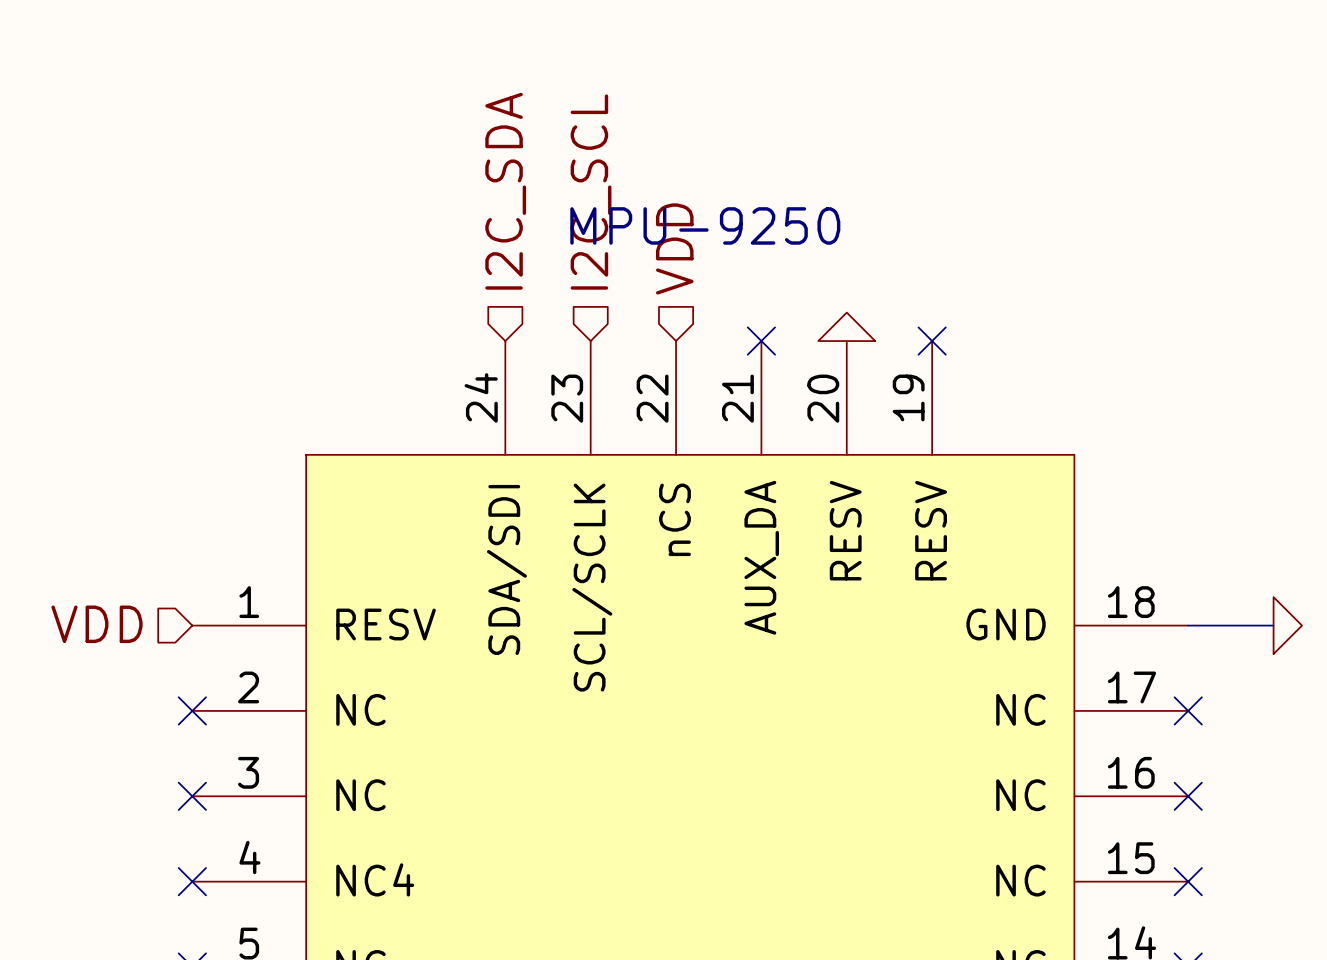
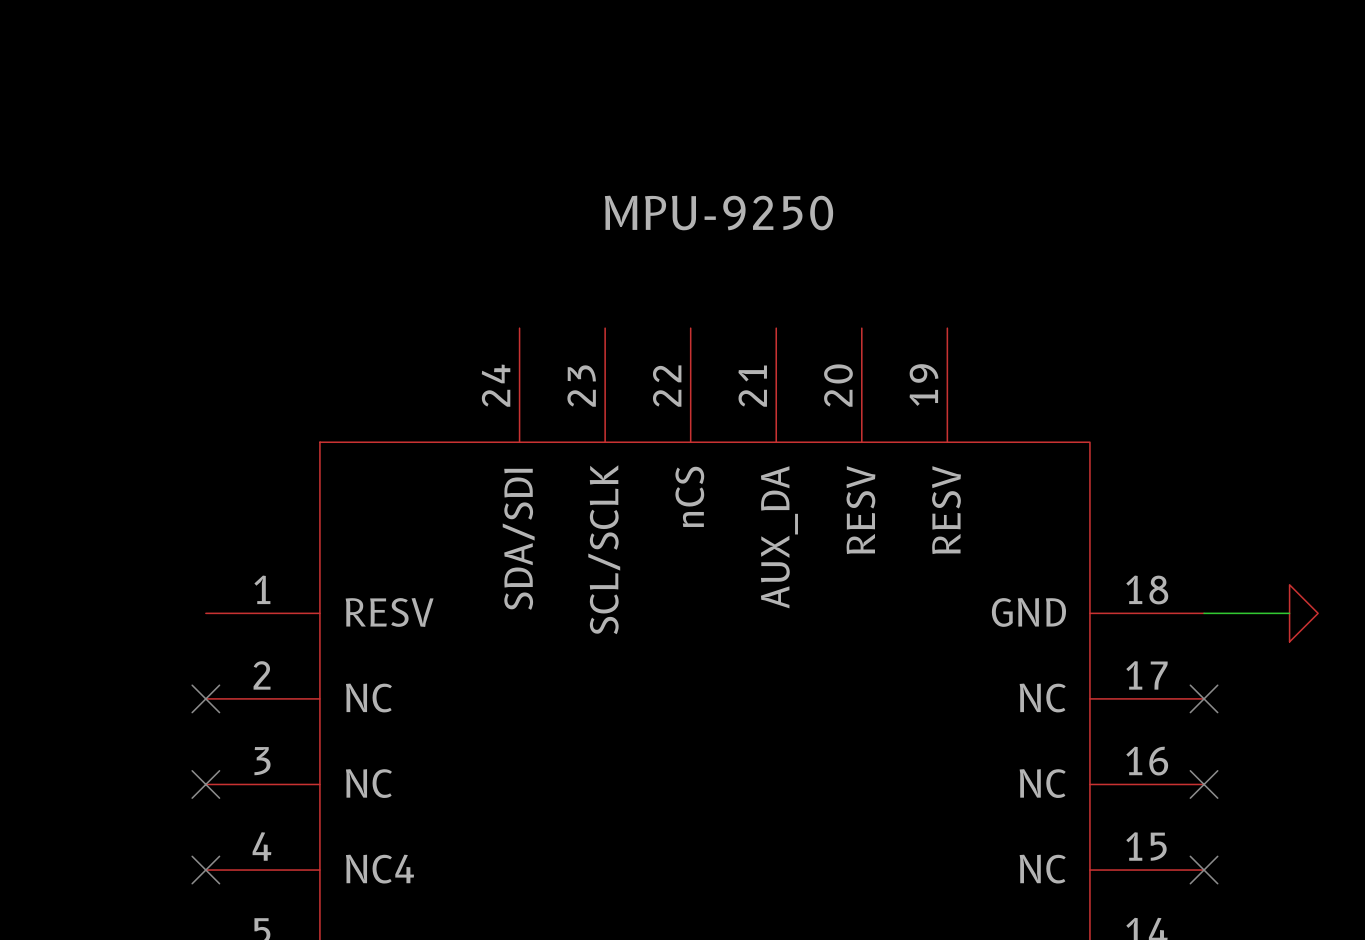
hierarchical label: I2C_SDA (505, 191) -> none
hierarchical label: I2C_SCL (591, 192) -> none
hierarchical label: VDD (674, 248) -> none
power symbol: (846, 326) -> none
no-connect mark: (761, 341) -> none
no-connect mark: (932, 341) -> none
hierarchical label: VDD (97, 624) -> none

